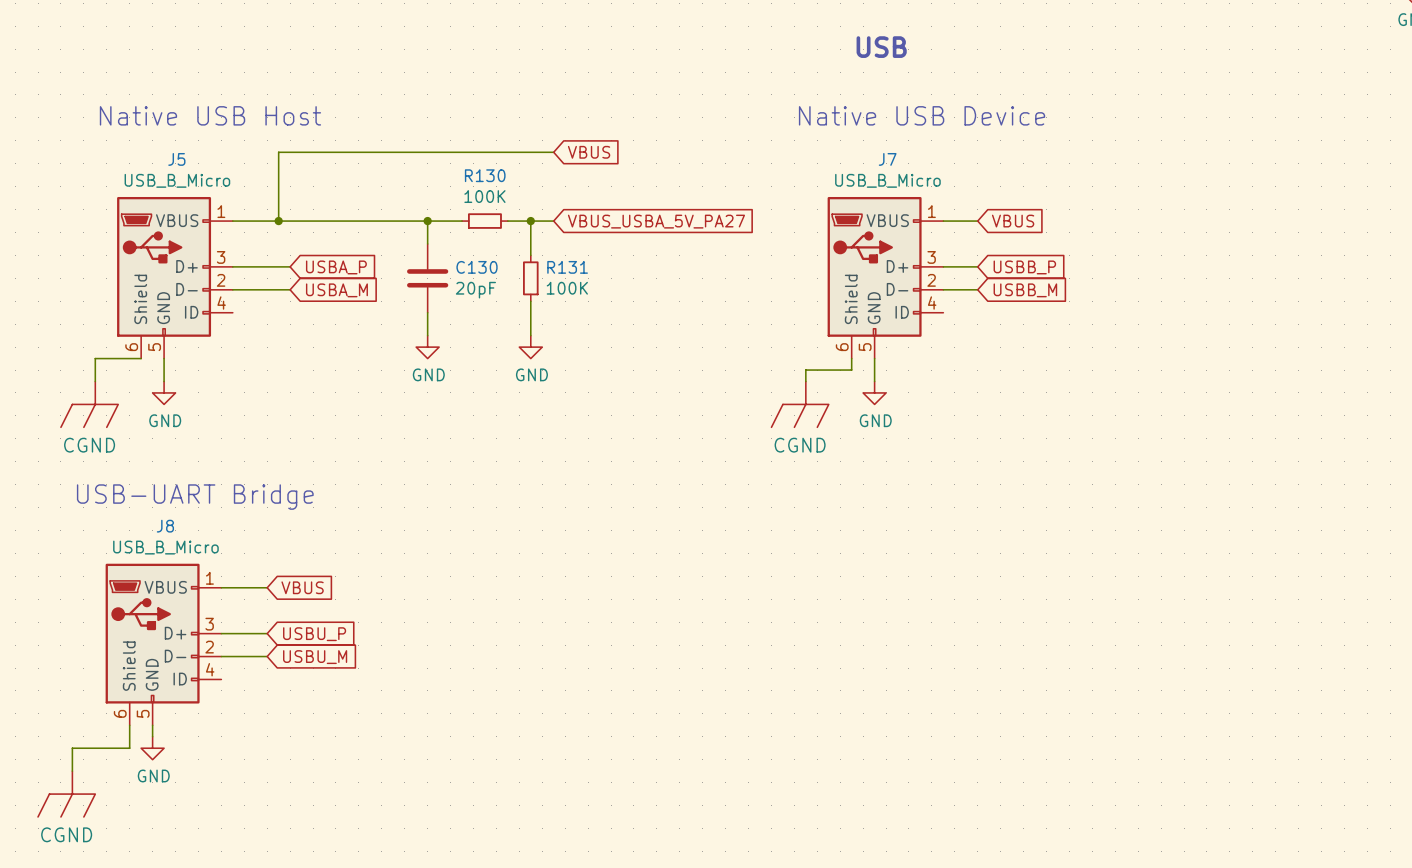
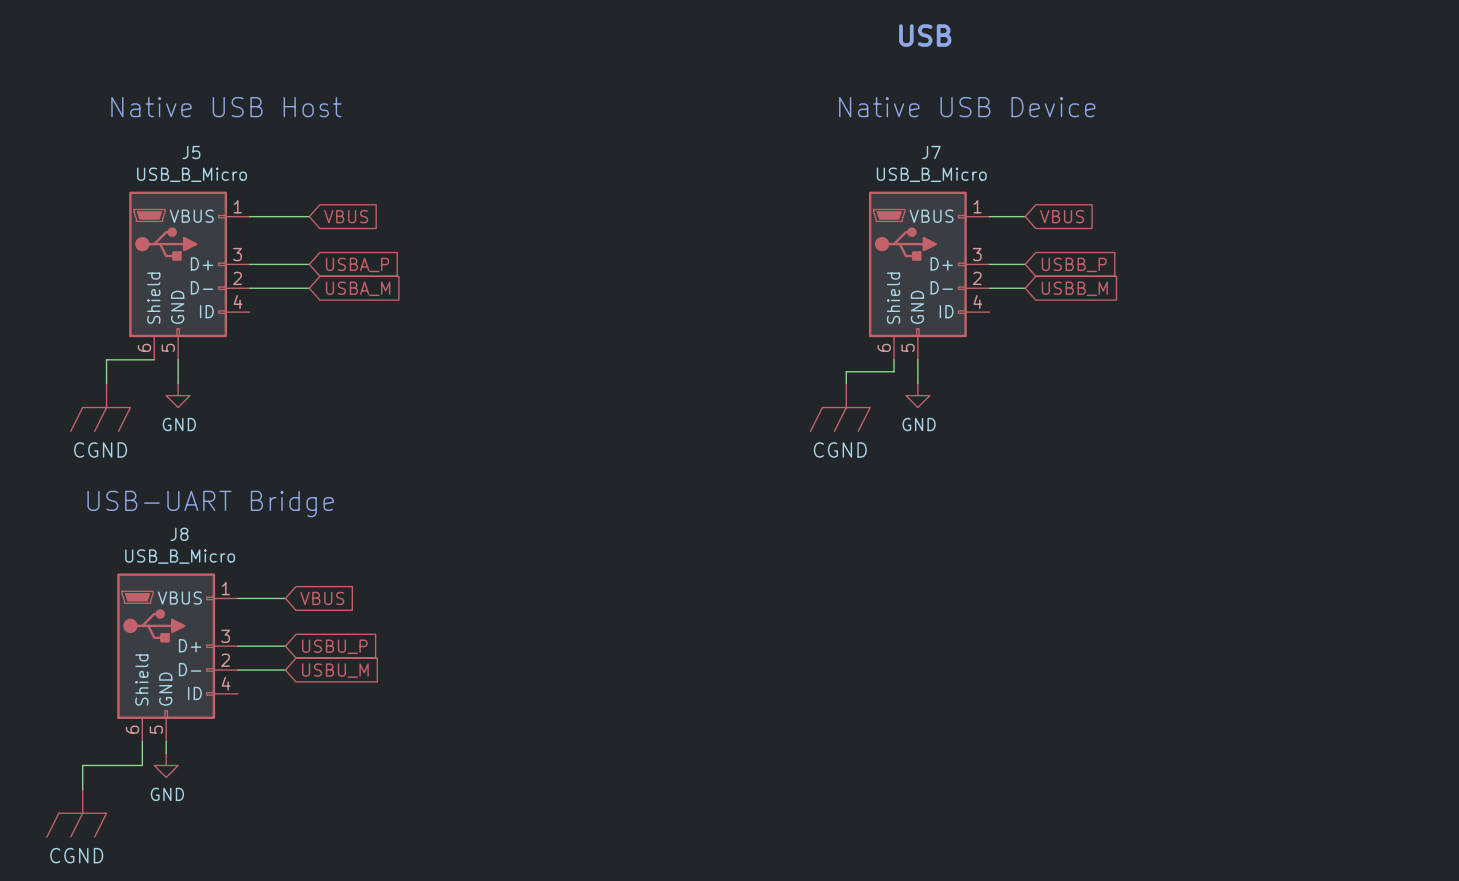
wire: (553, 152) (278, 152) (278, 221) -> none
global label: VBUS (589, 152) -> none
junction: (278, 221) -> none
wire: (290, 221) (462, 221) -> none
global label: none -> VBUS (346, 216)
wire: (427, 221) (427, 243) -> none
junction: (427, 221) -> none
R130: 100K (484, 221) -> none
wire: (507, 221) (553, 221) -> none
wire: (530, 221) (530, 255) -> none
junction: (530, 221) -> none
global label: VBUS_USBA_5V_PA27 (656, 221) -> none
C130: 20pF (427, 278) -> none
R131: 100K (530, 278) -> none
wire: (530, 301) (530, 335) -> none
wire: (427, 312) (427, 335) -> none
power symbol: GND (427, 347) -> none
power symbol: GND (530, 347) -> none

